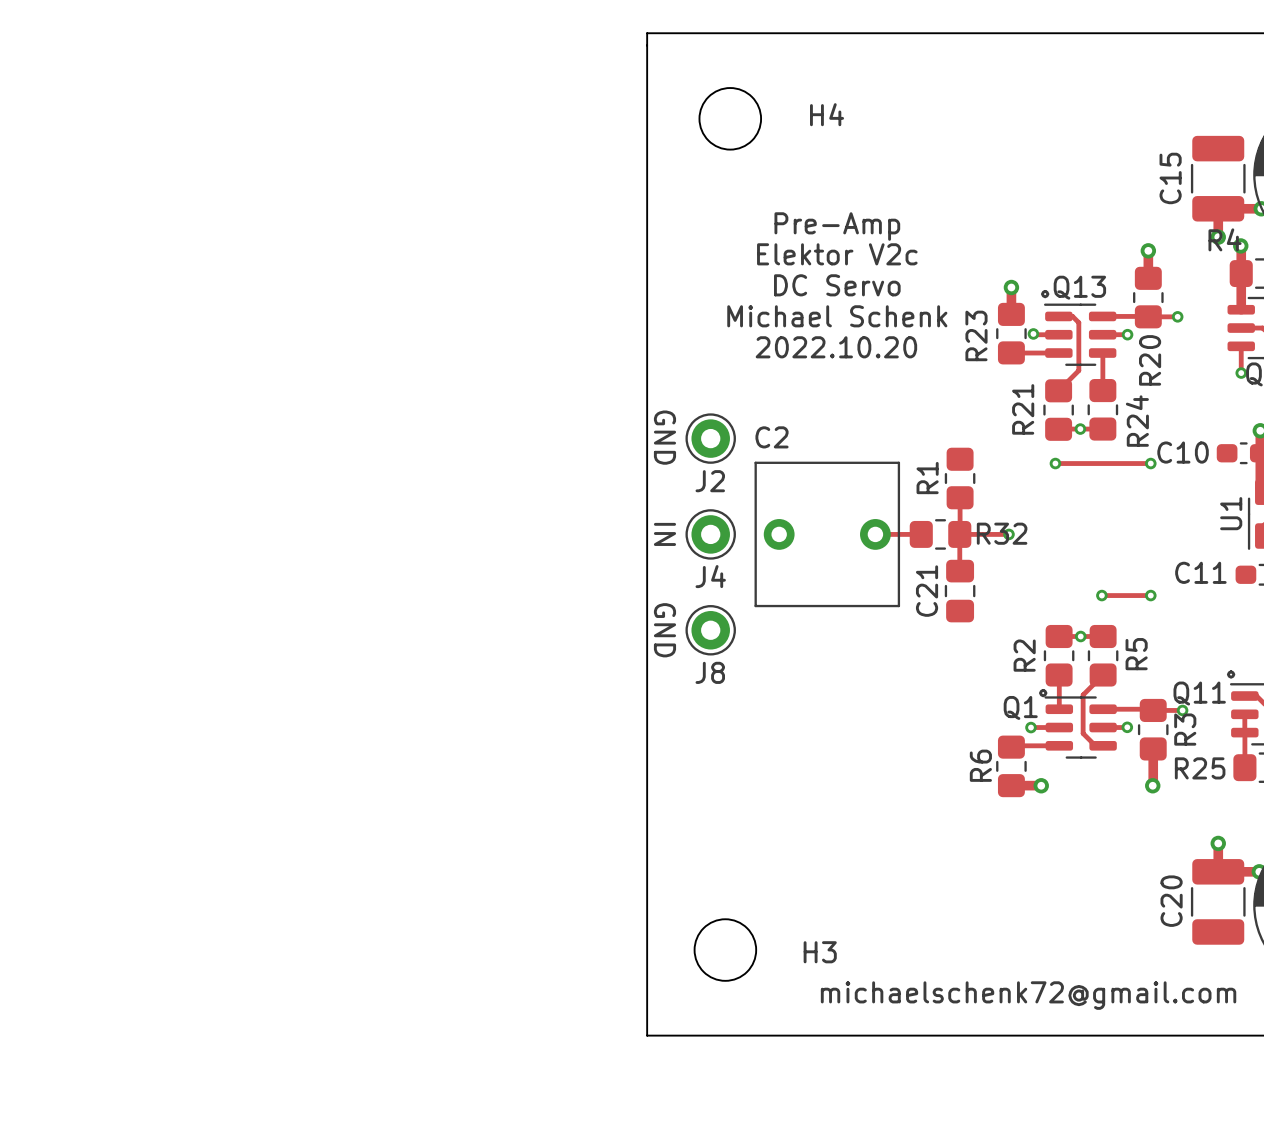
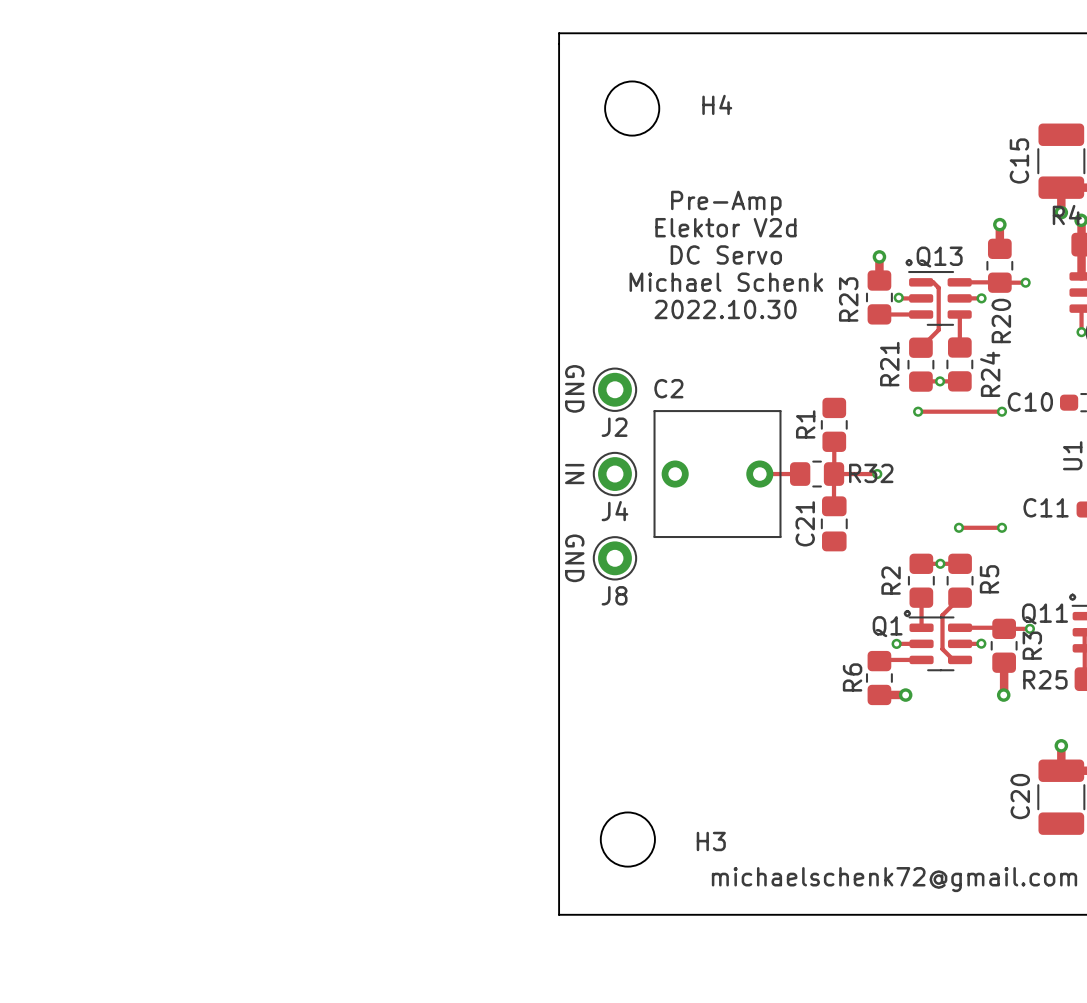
text: Elektor V2c (837, 254) -> Elektor V2d (725, 227)
text: 2022.10.20 (836, 347) -> 2022.10.30 (725, 309)

